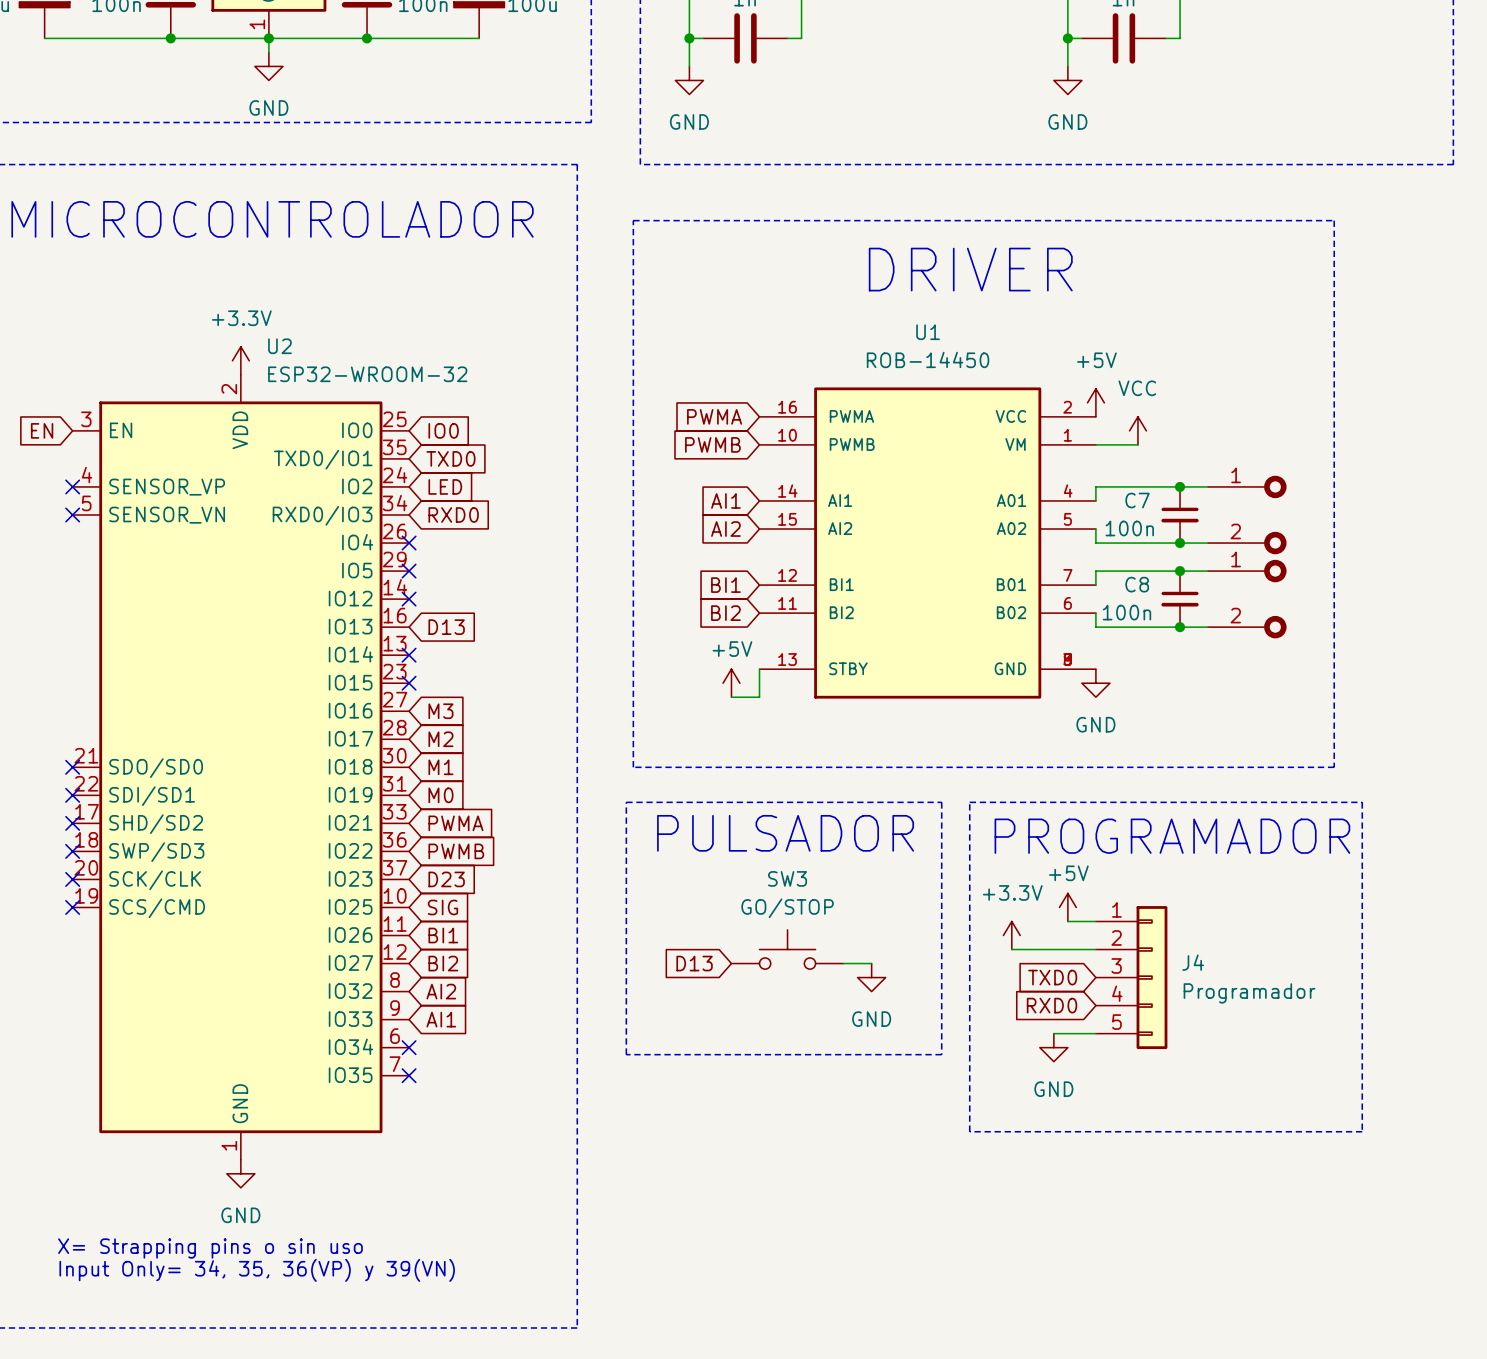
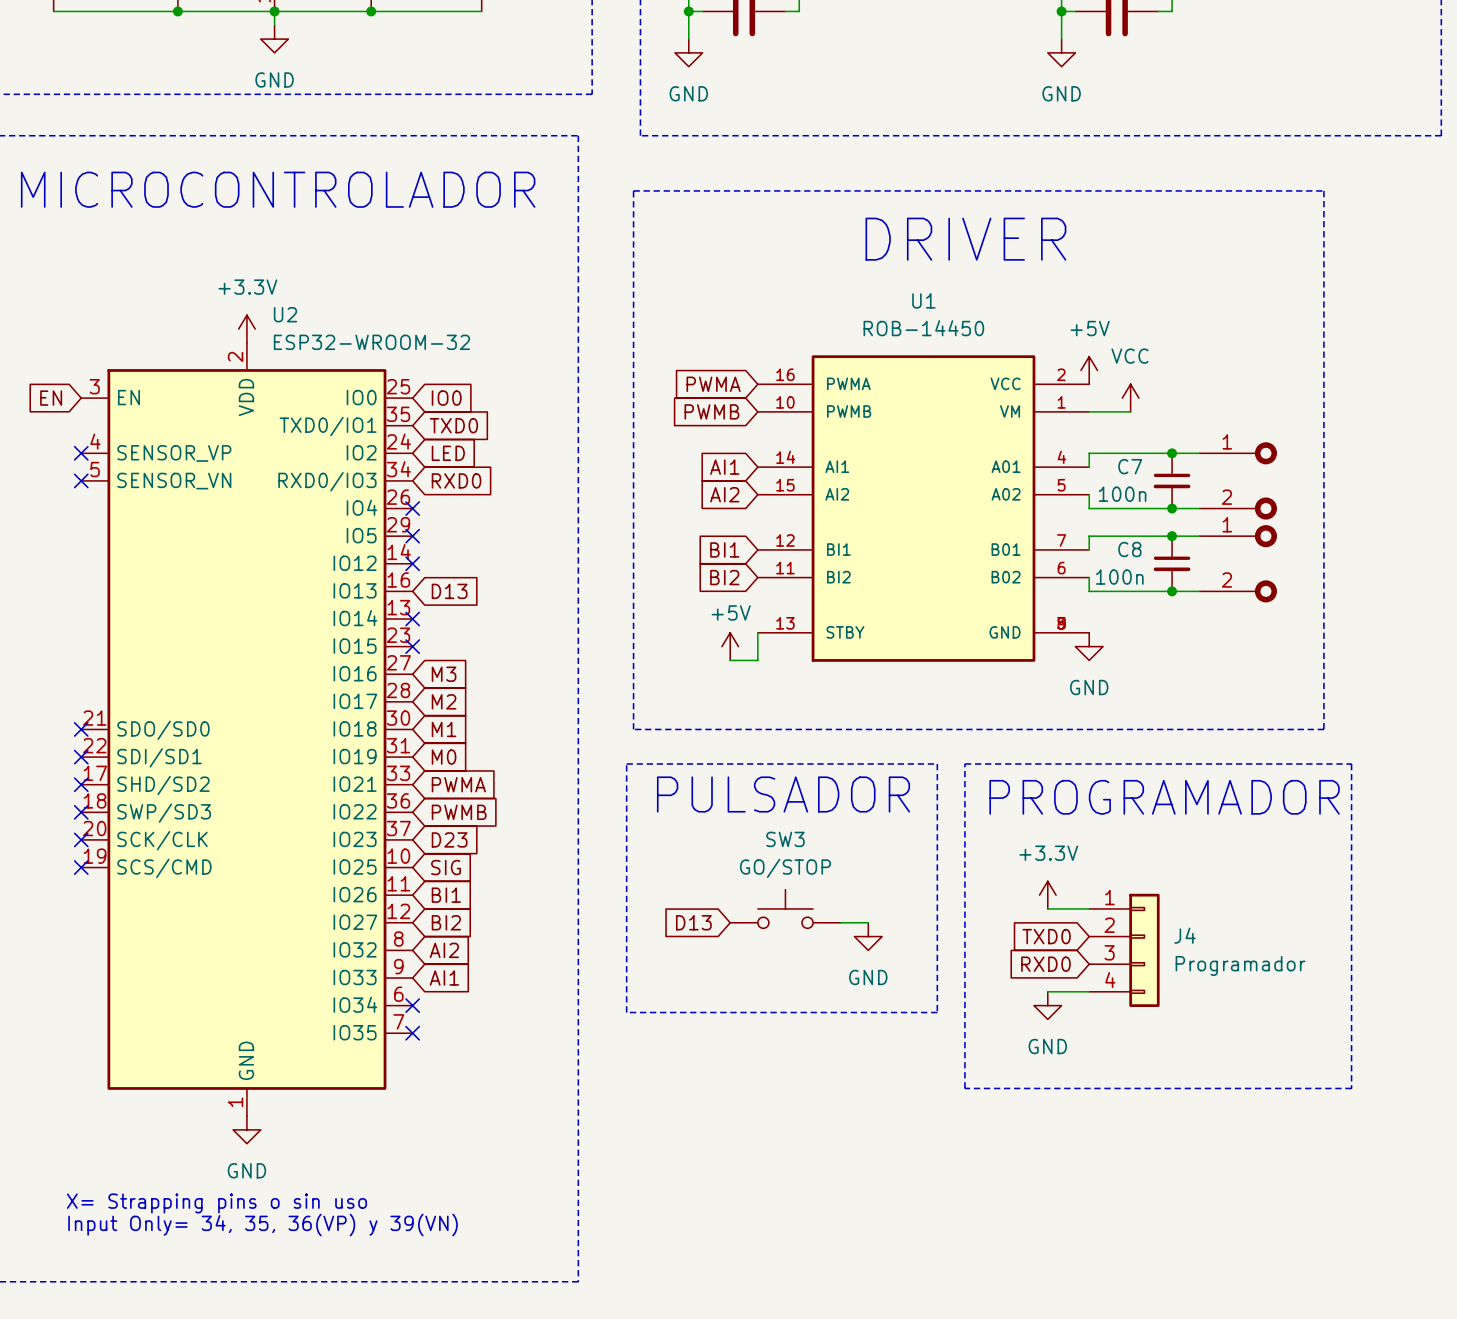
J4 symbol: [1095, 906, 1168, 1050] -> [1089, 893, 1160, 1008]
power symbol: +5V (1067, 907) -> none
wire: (1067, 921) (1095, 921) -> none
power symbol position: +3.3V (1011, 935) -> +3.3V (1047, 895)
wire: (1011, 949) (1053, 949) -> none

